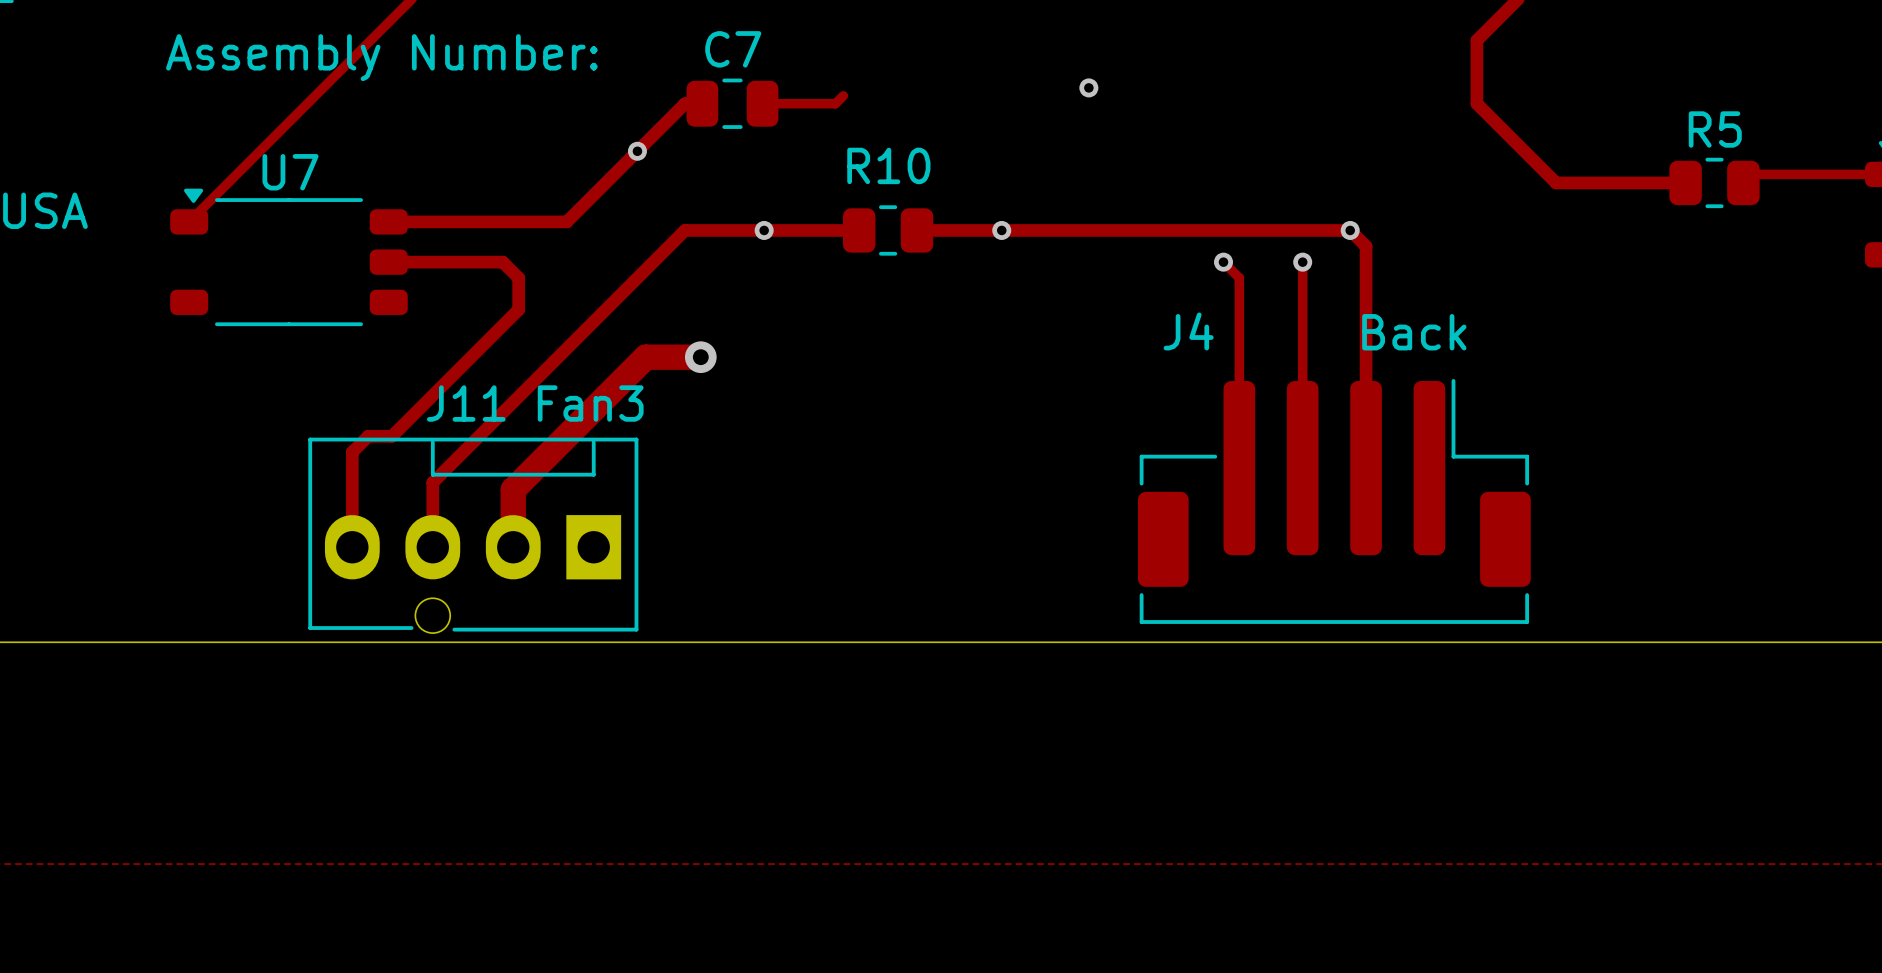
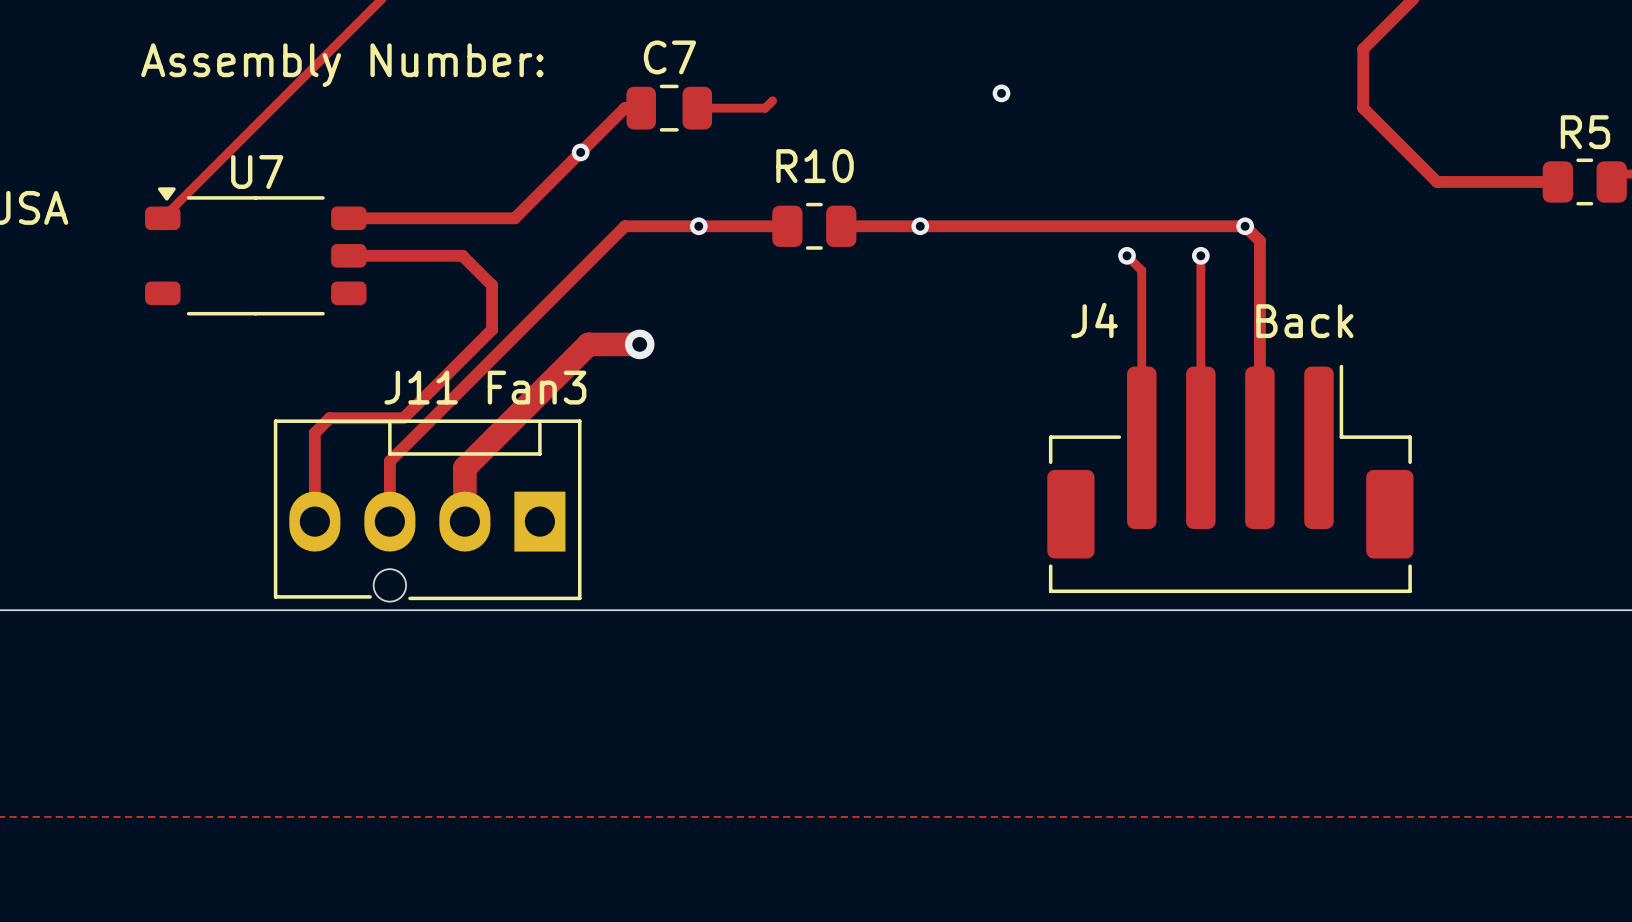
track: (502, 262) (518, 277) (518, 309) (391, 436) -> (455, 255) (462, 255) (492, 285) (492, 329) (403, 418) (351, 418)

